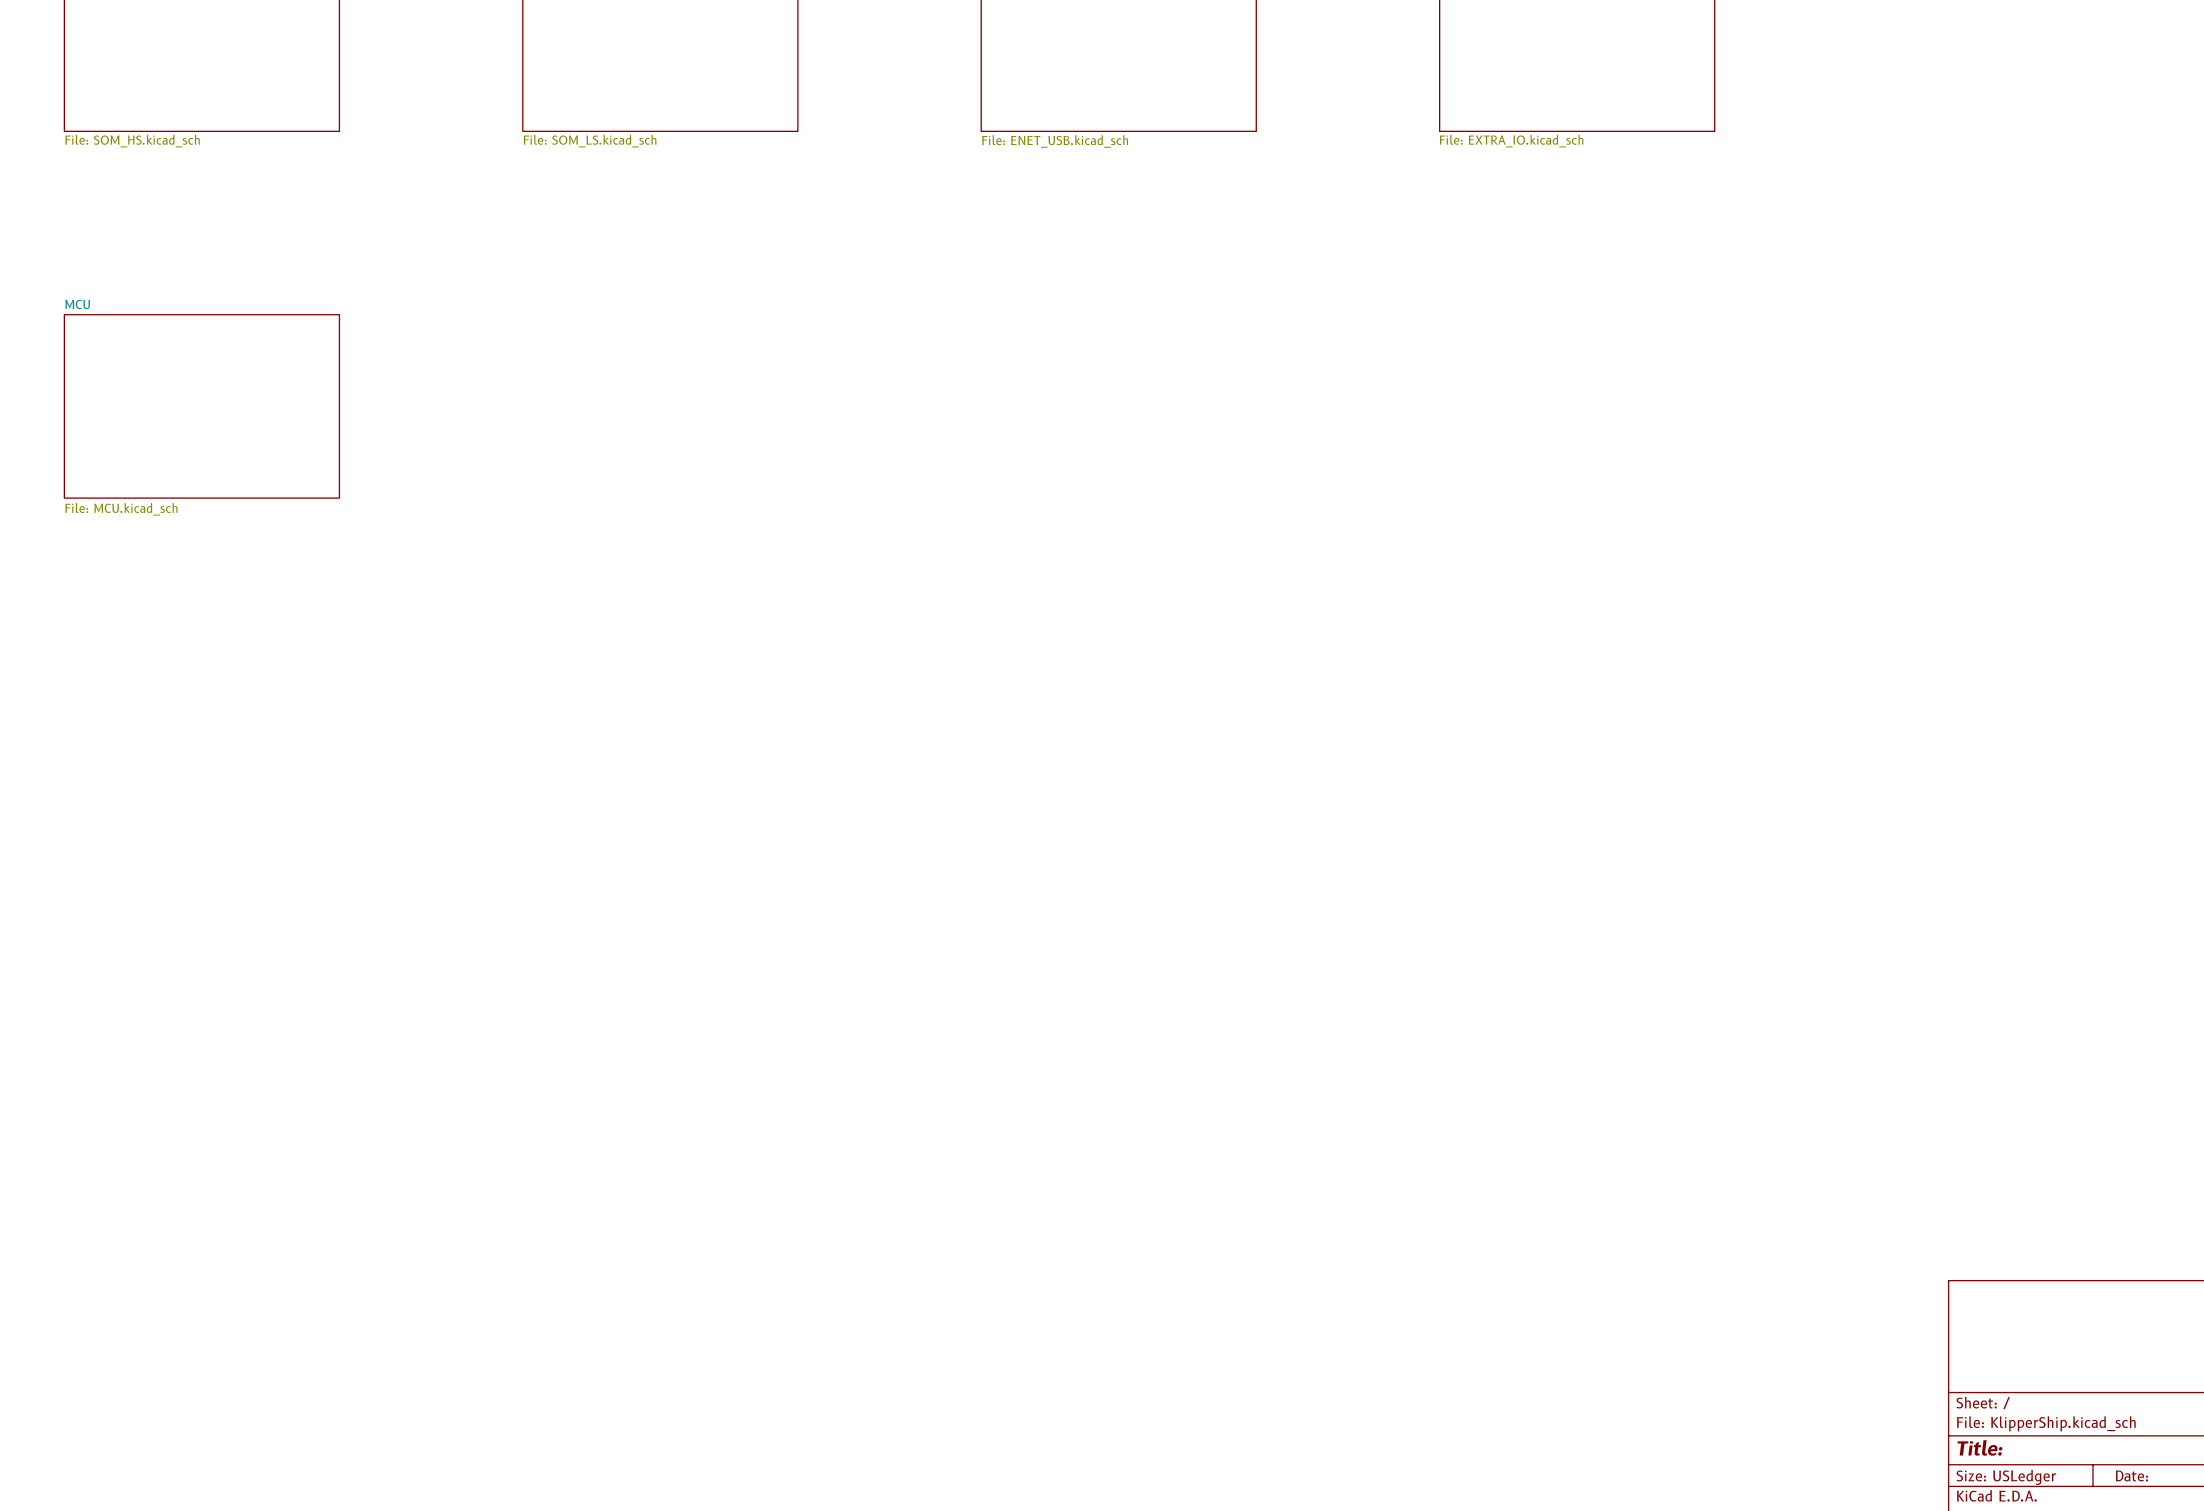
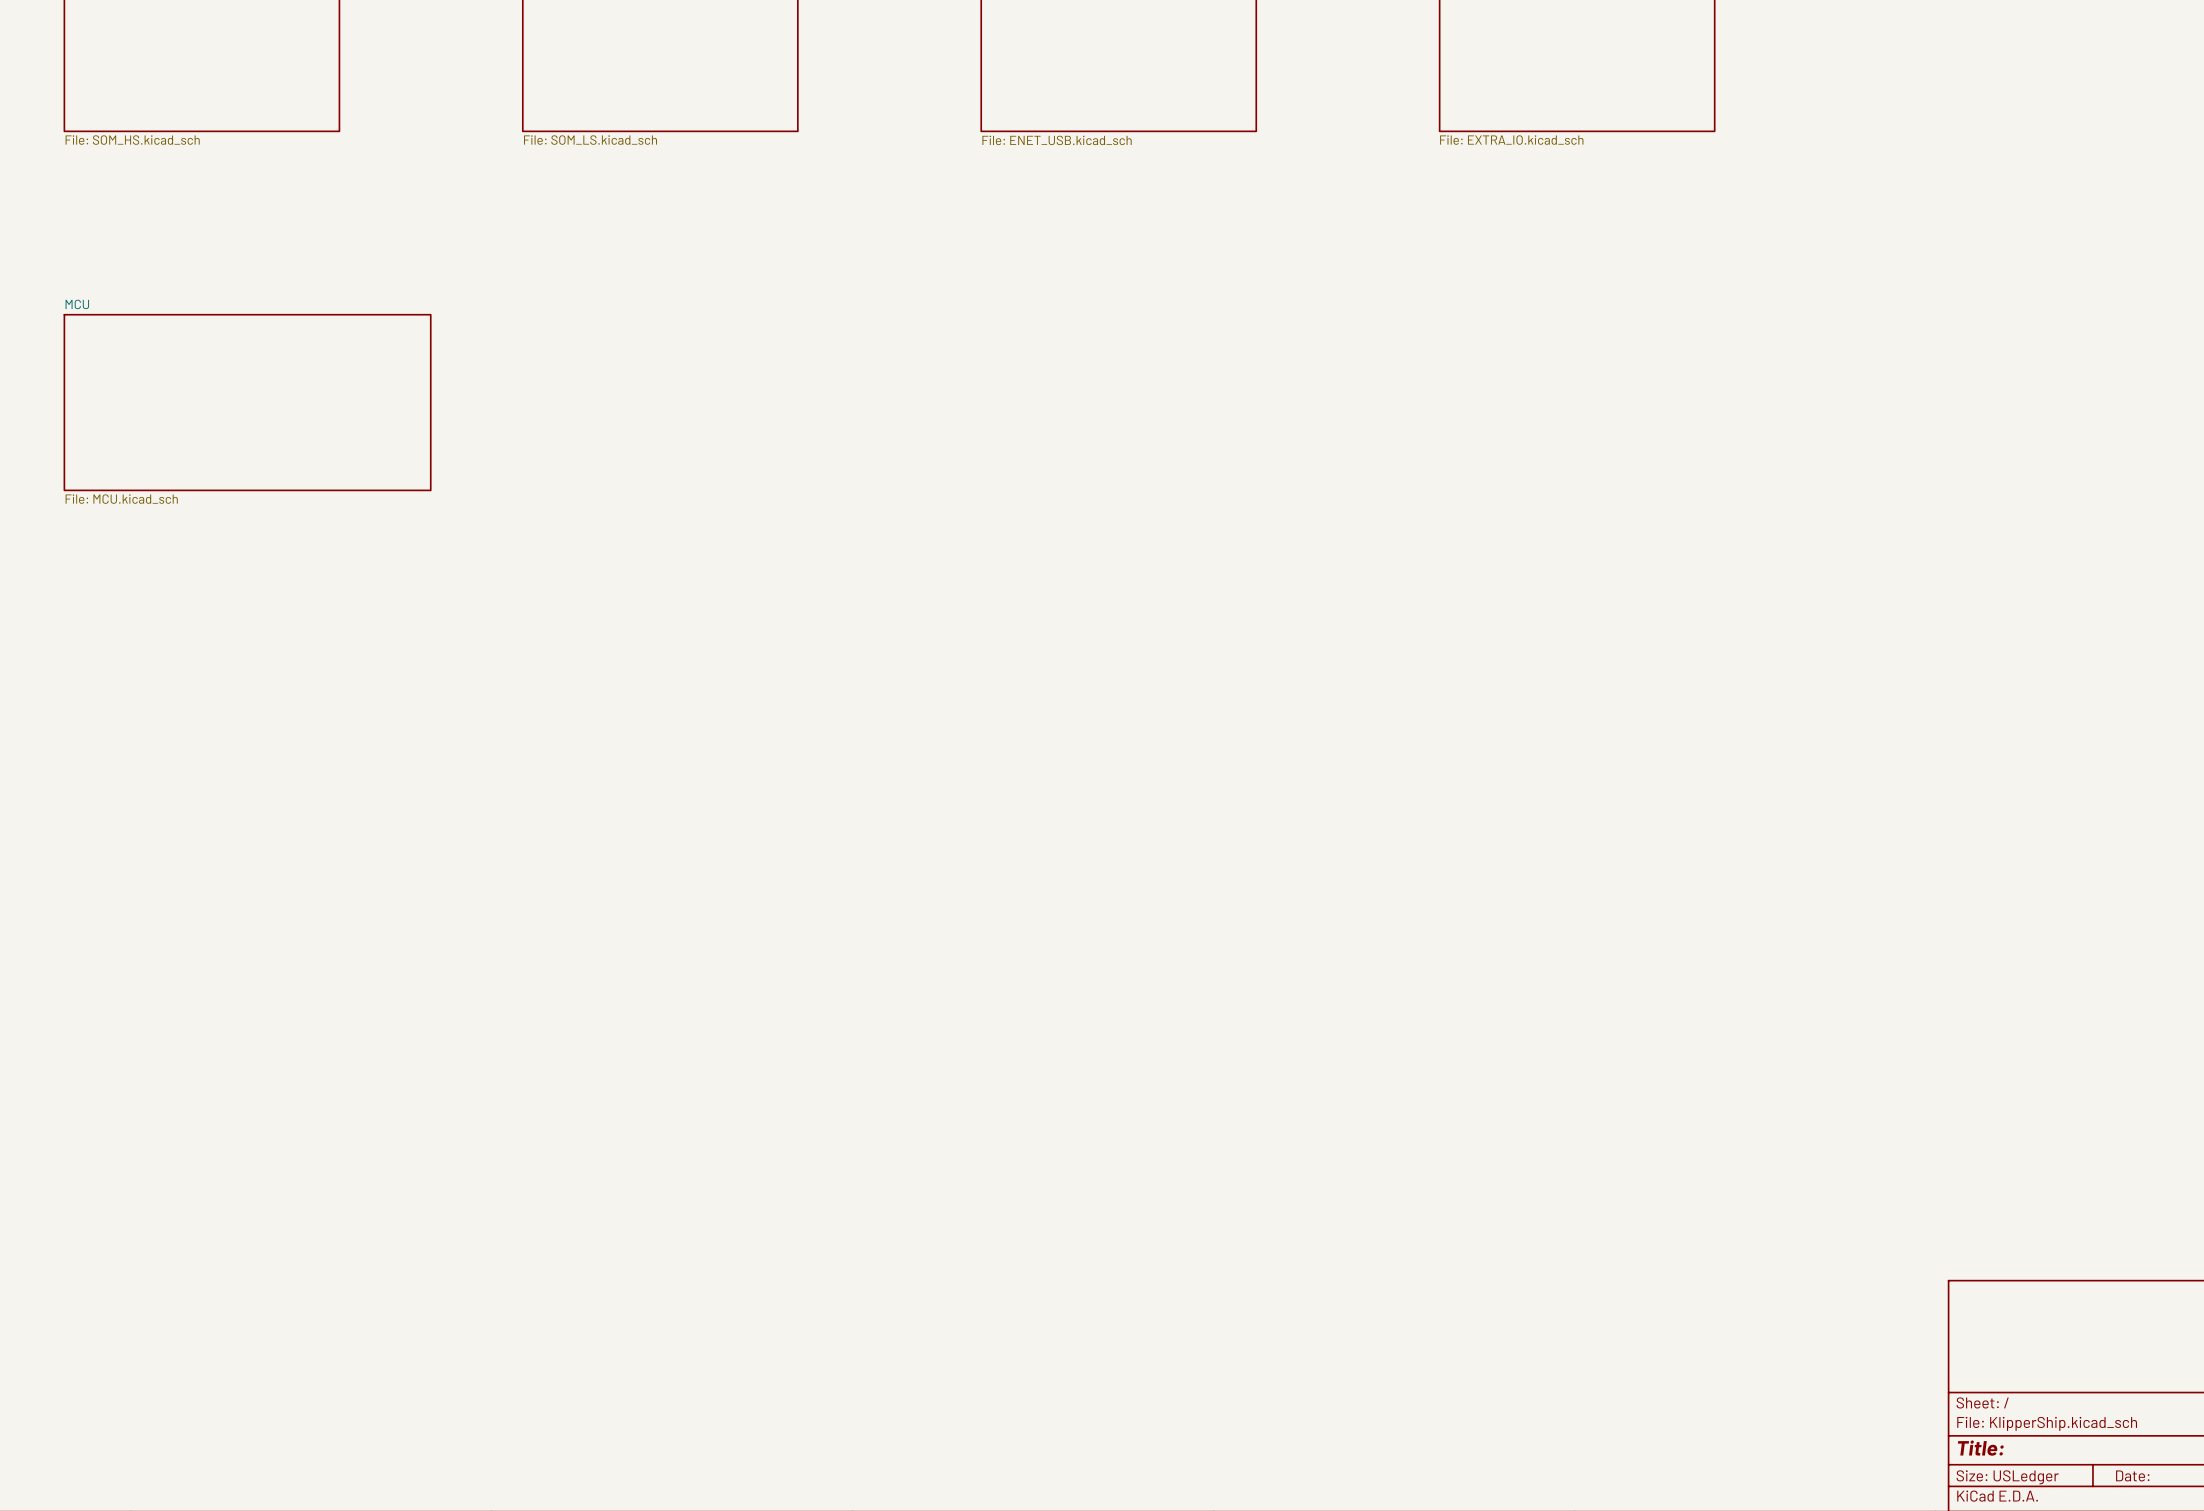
sheet MCU: none -> File: MCU.kicad_sch (247, 402)
sheet MCU: File: MCU.kicad_sch (201, 406) -> none

